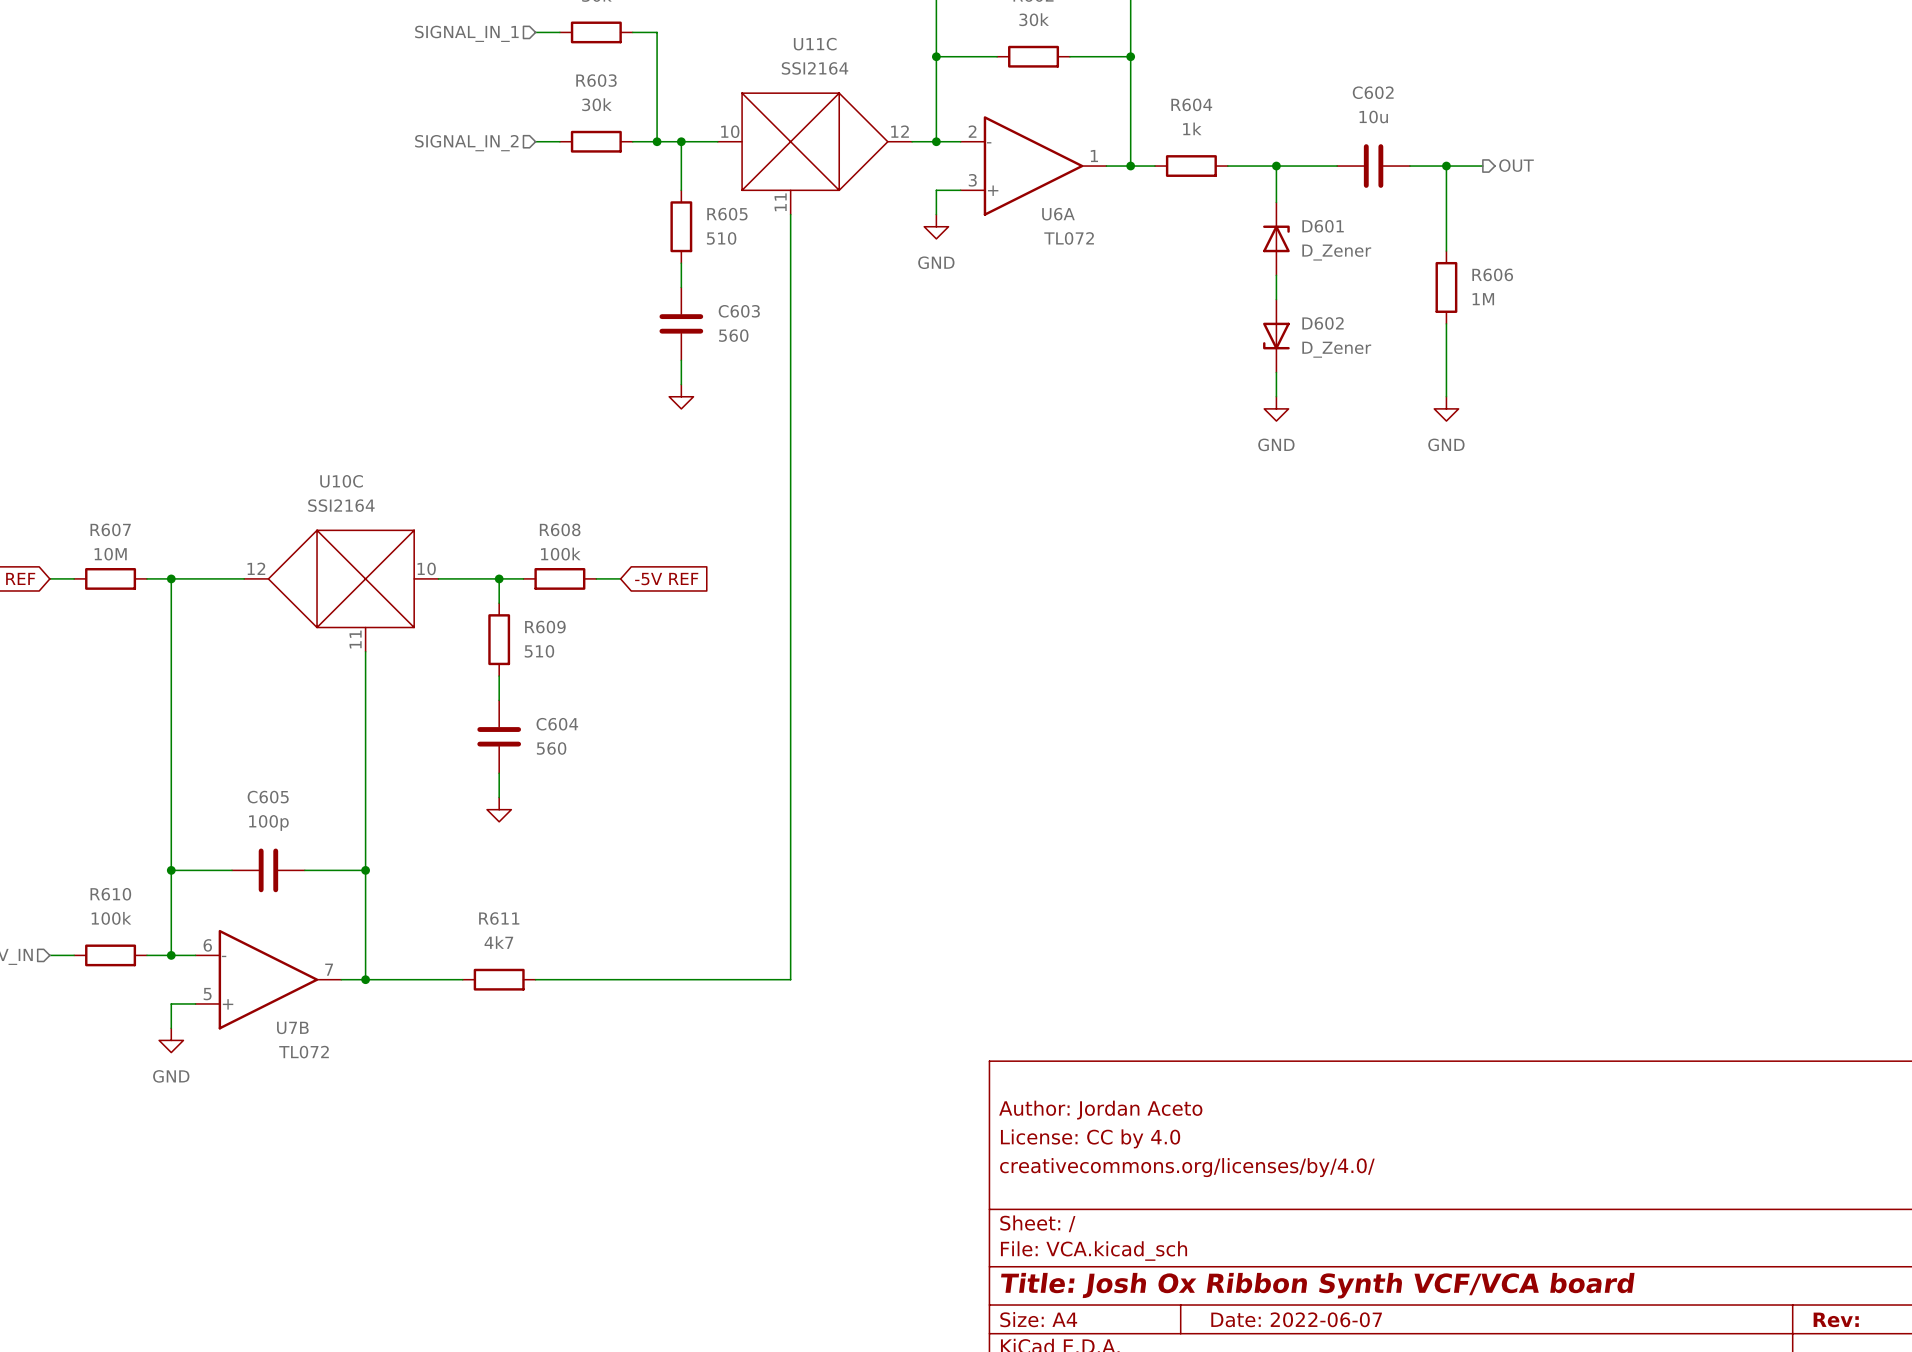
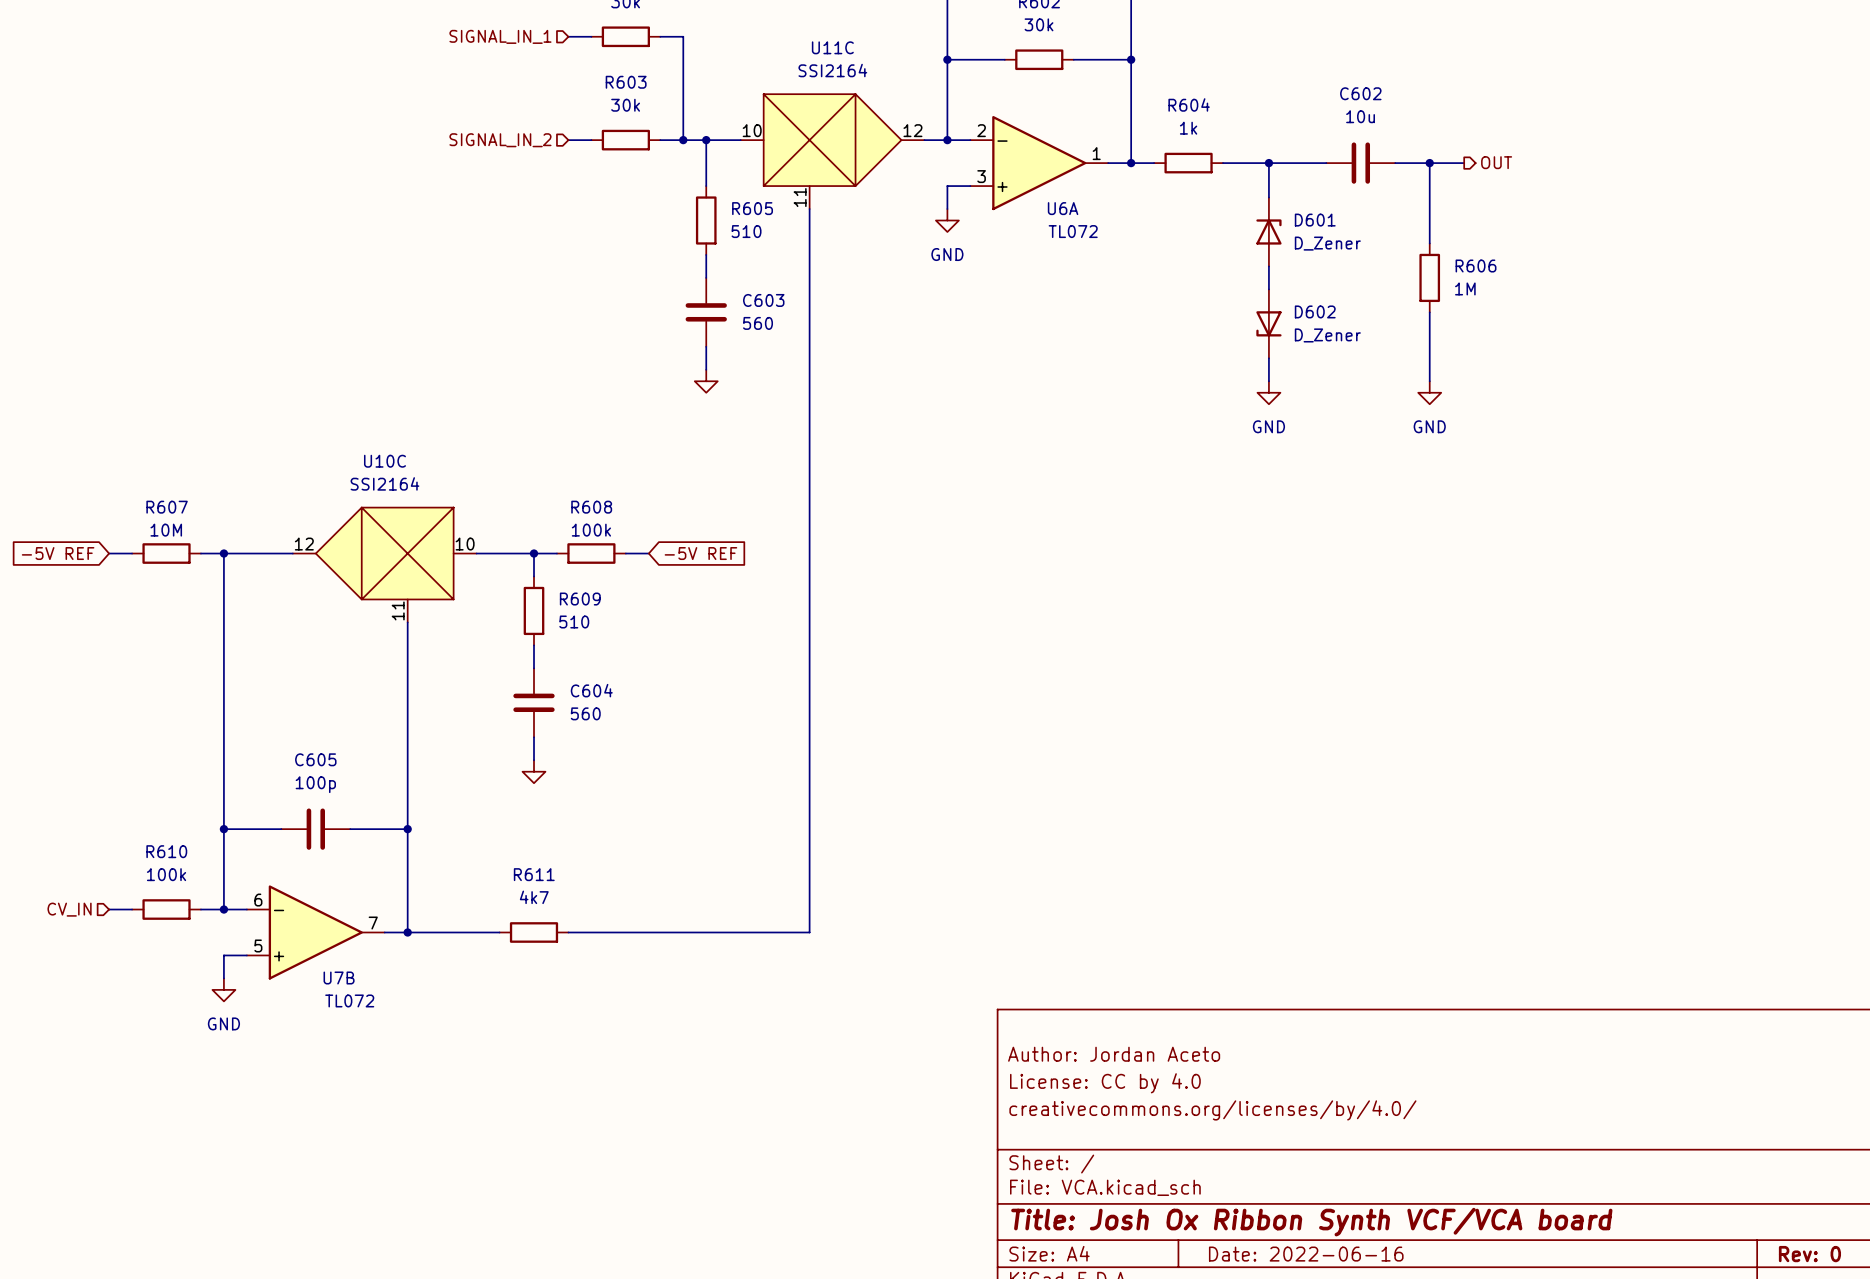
title block: Date: 2022-06-07 (1296, 1319) -> Date: 2022-06-16 (1306, 1254)
title block: Rev: (1836, 1319) -> Rev: 0 (1809, 1254)

